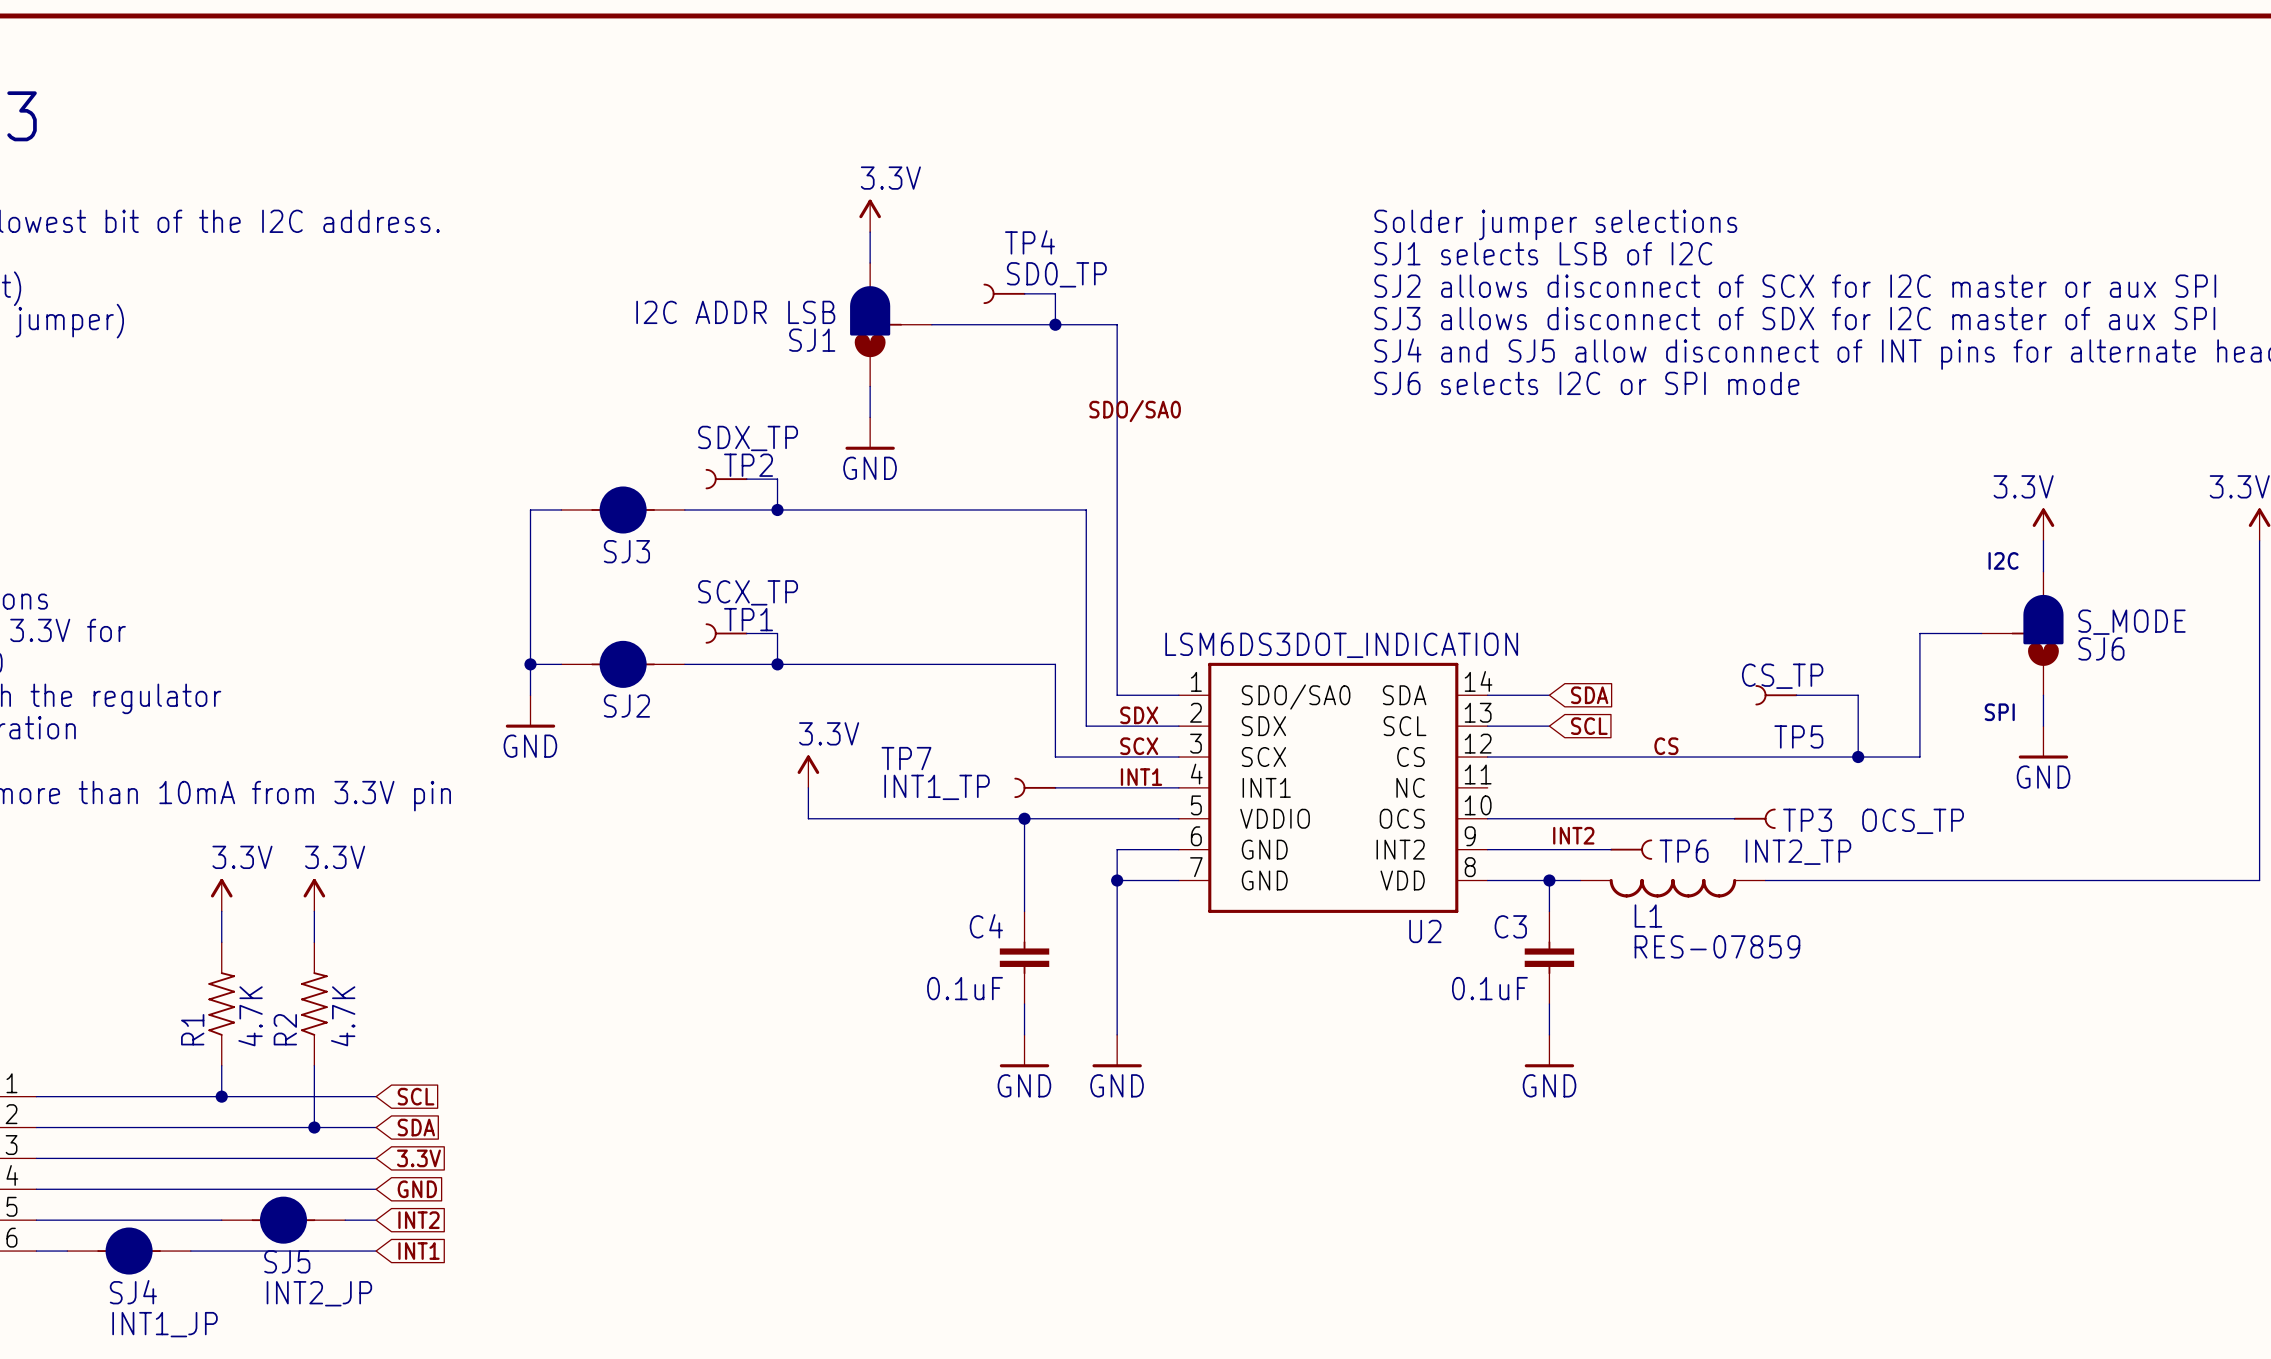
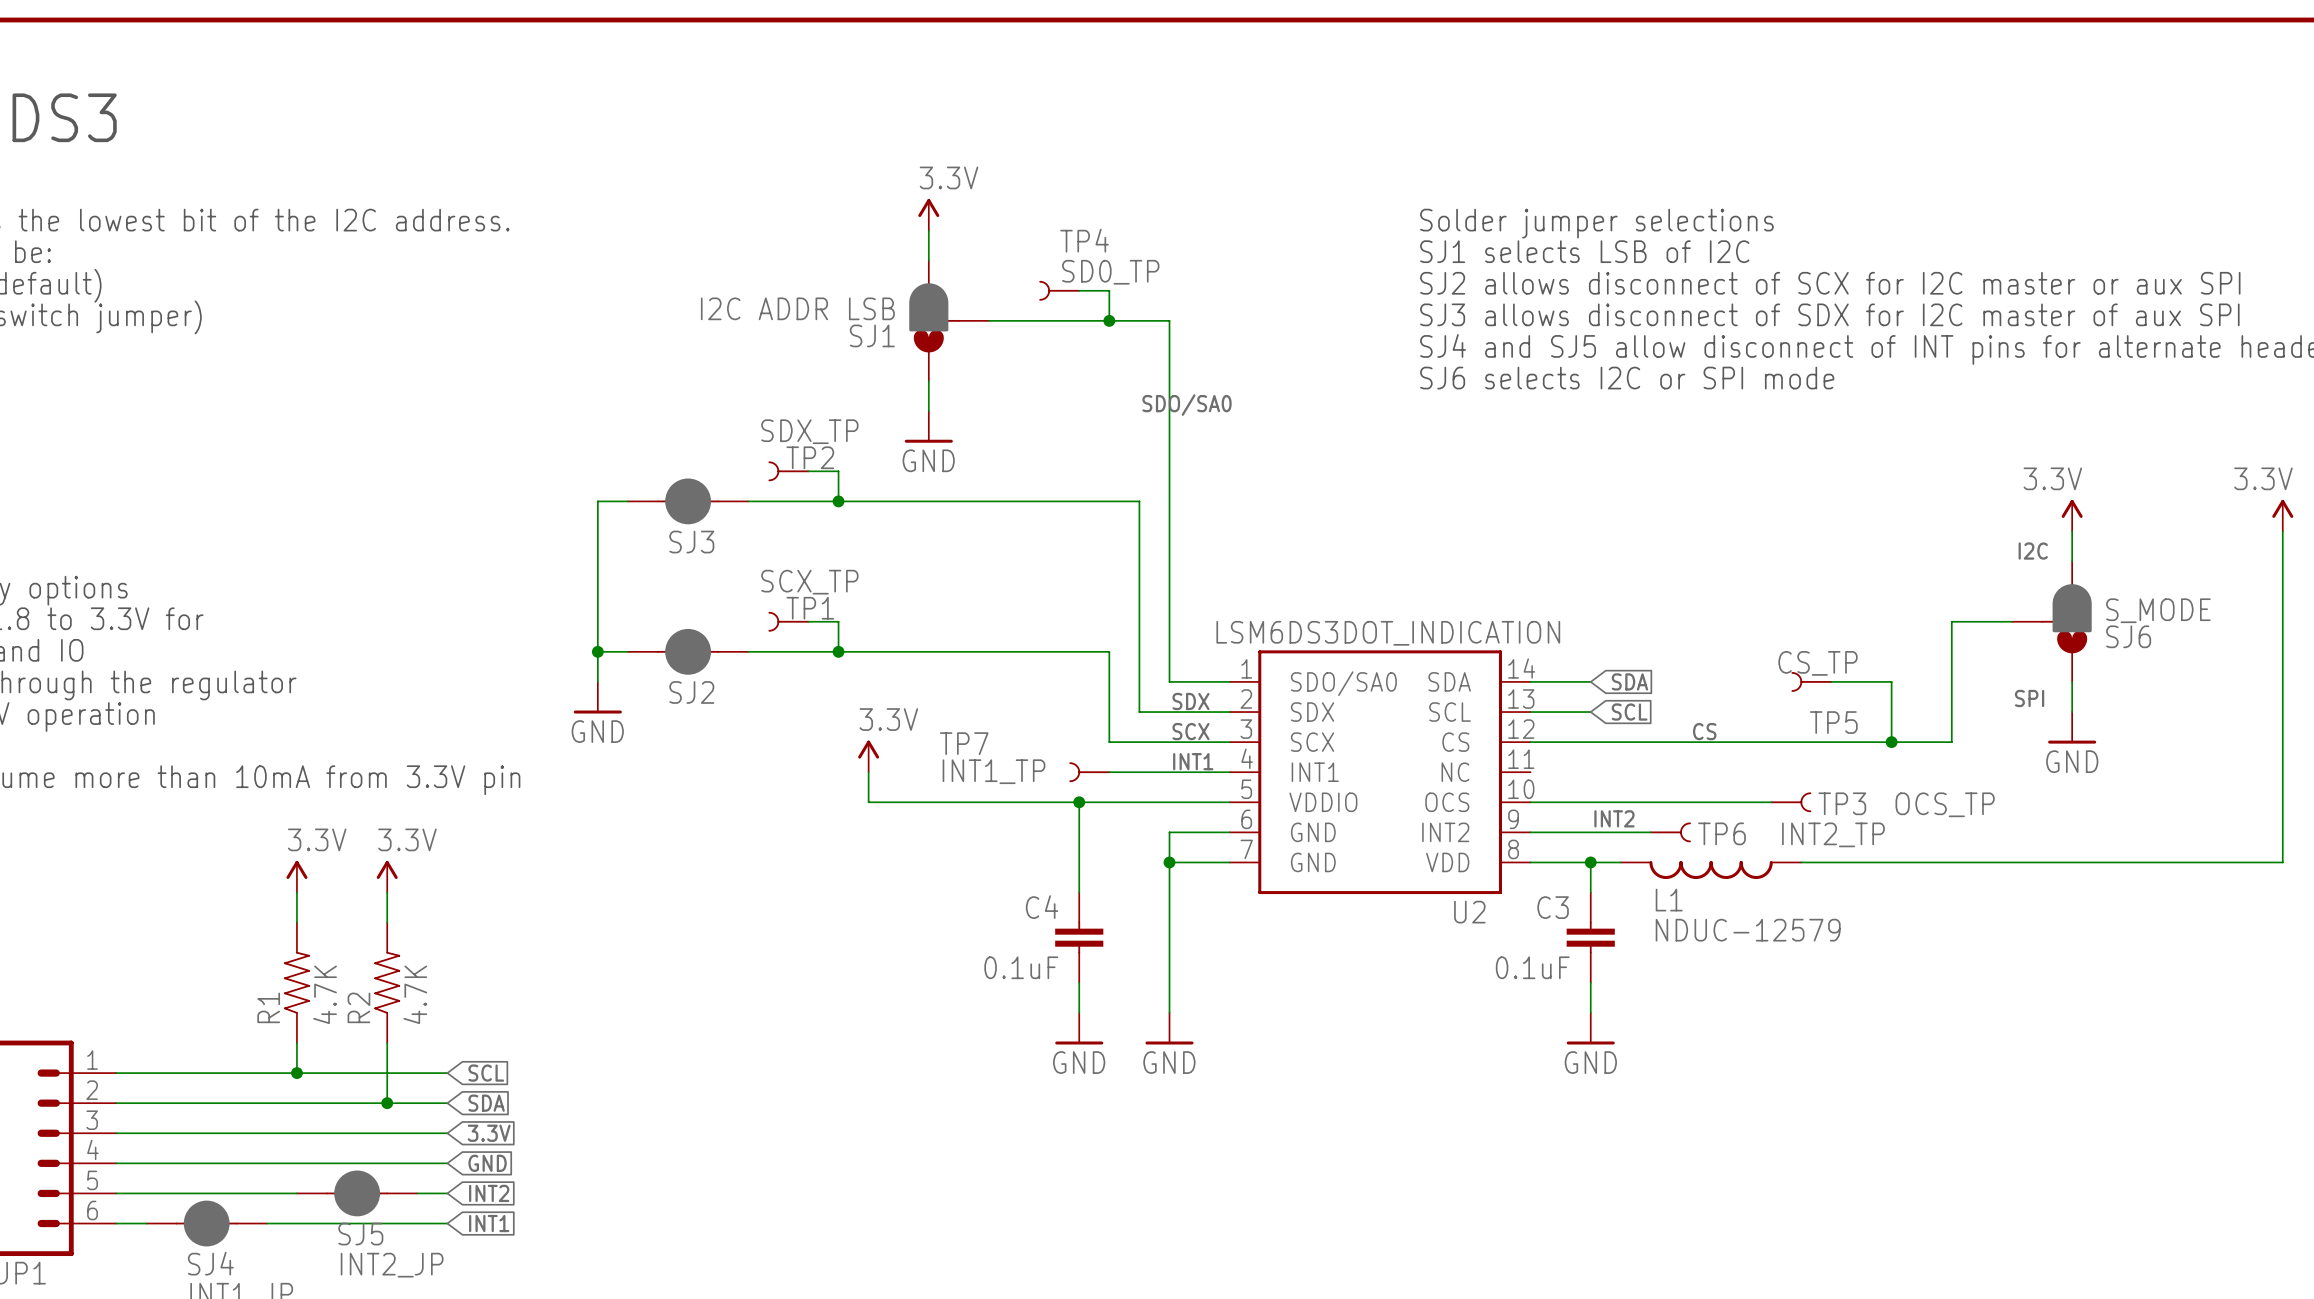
L1 name position: L1 (1648, 916) -> L1 (1669, 900)
L1 value: RES-07859 (1717, 946) -> NDUC-12579 (1748, 930)

